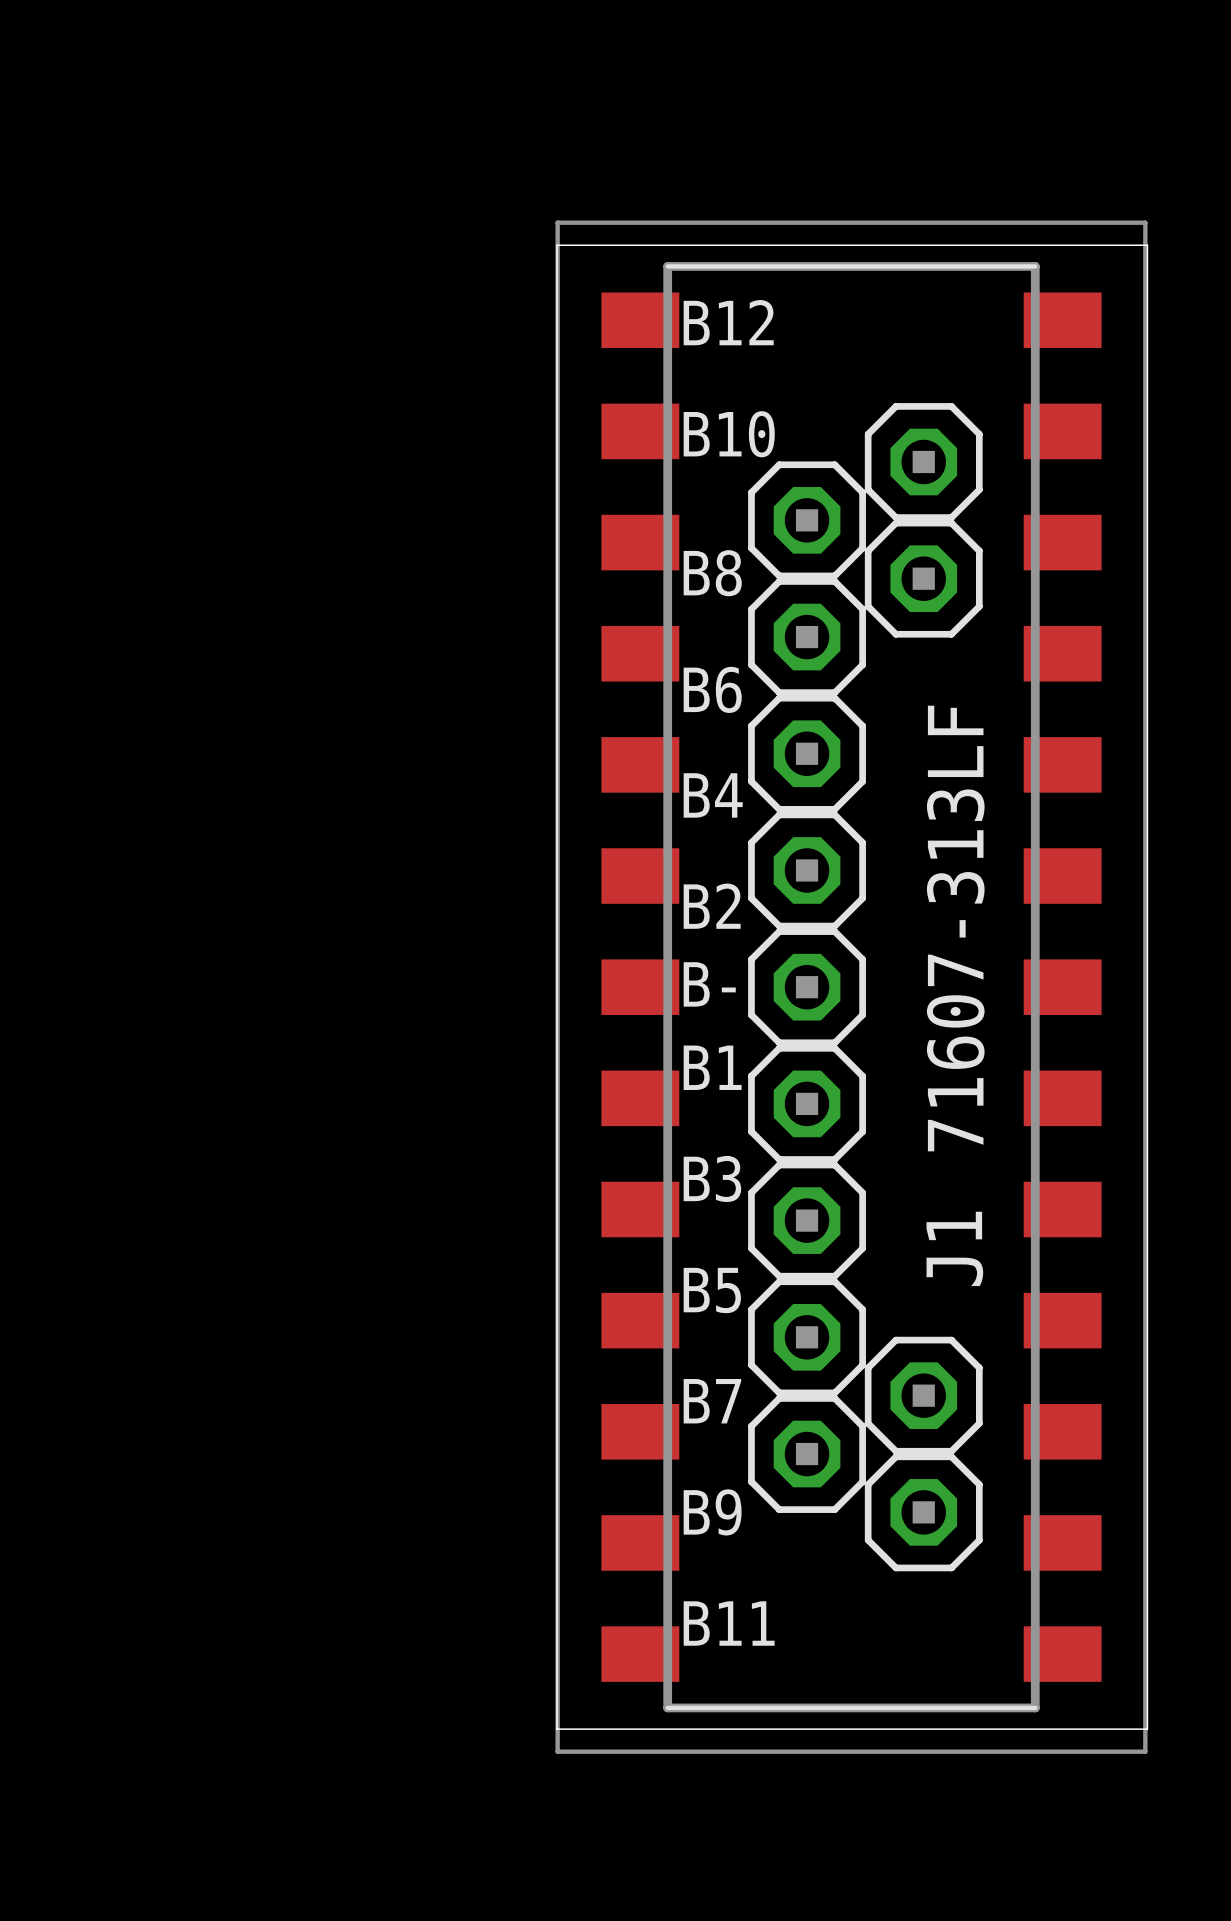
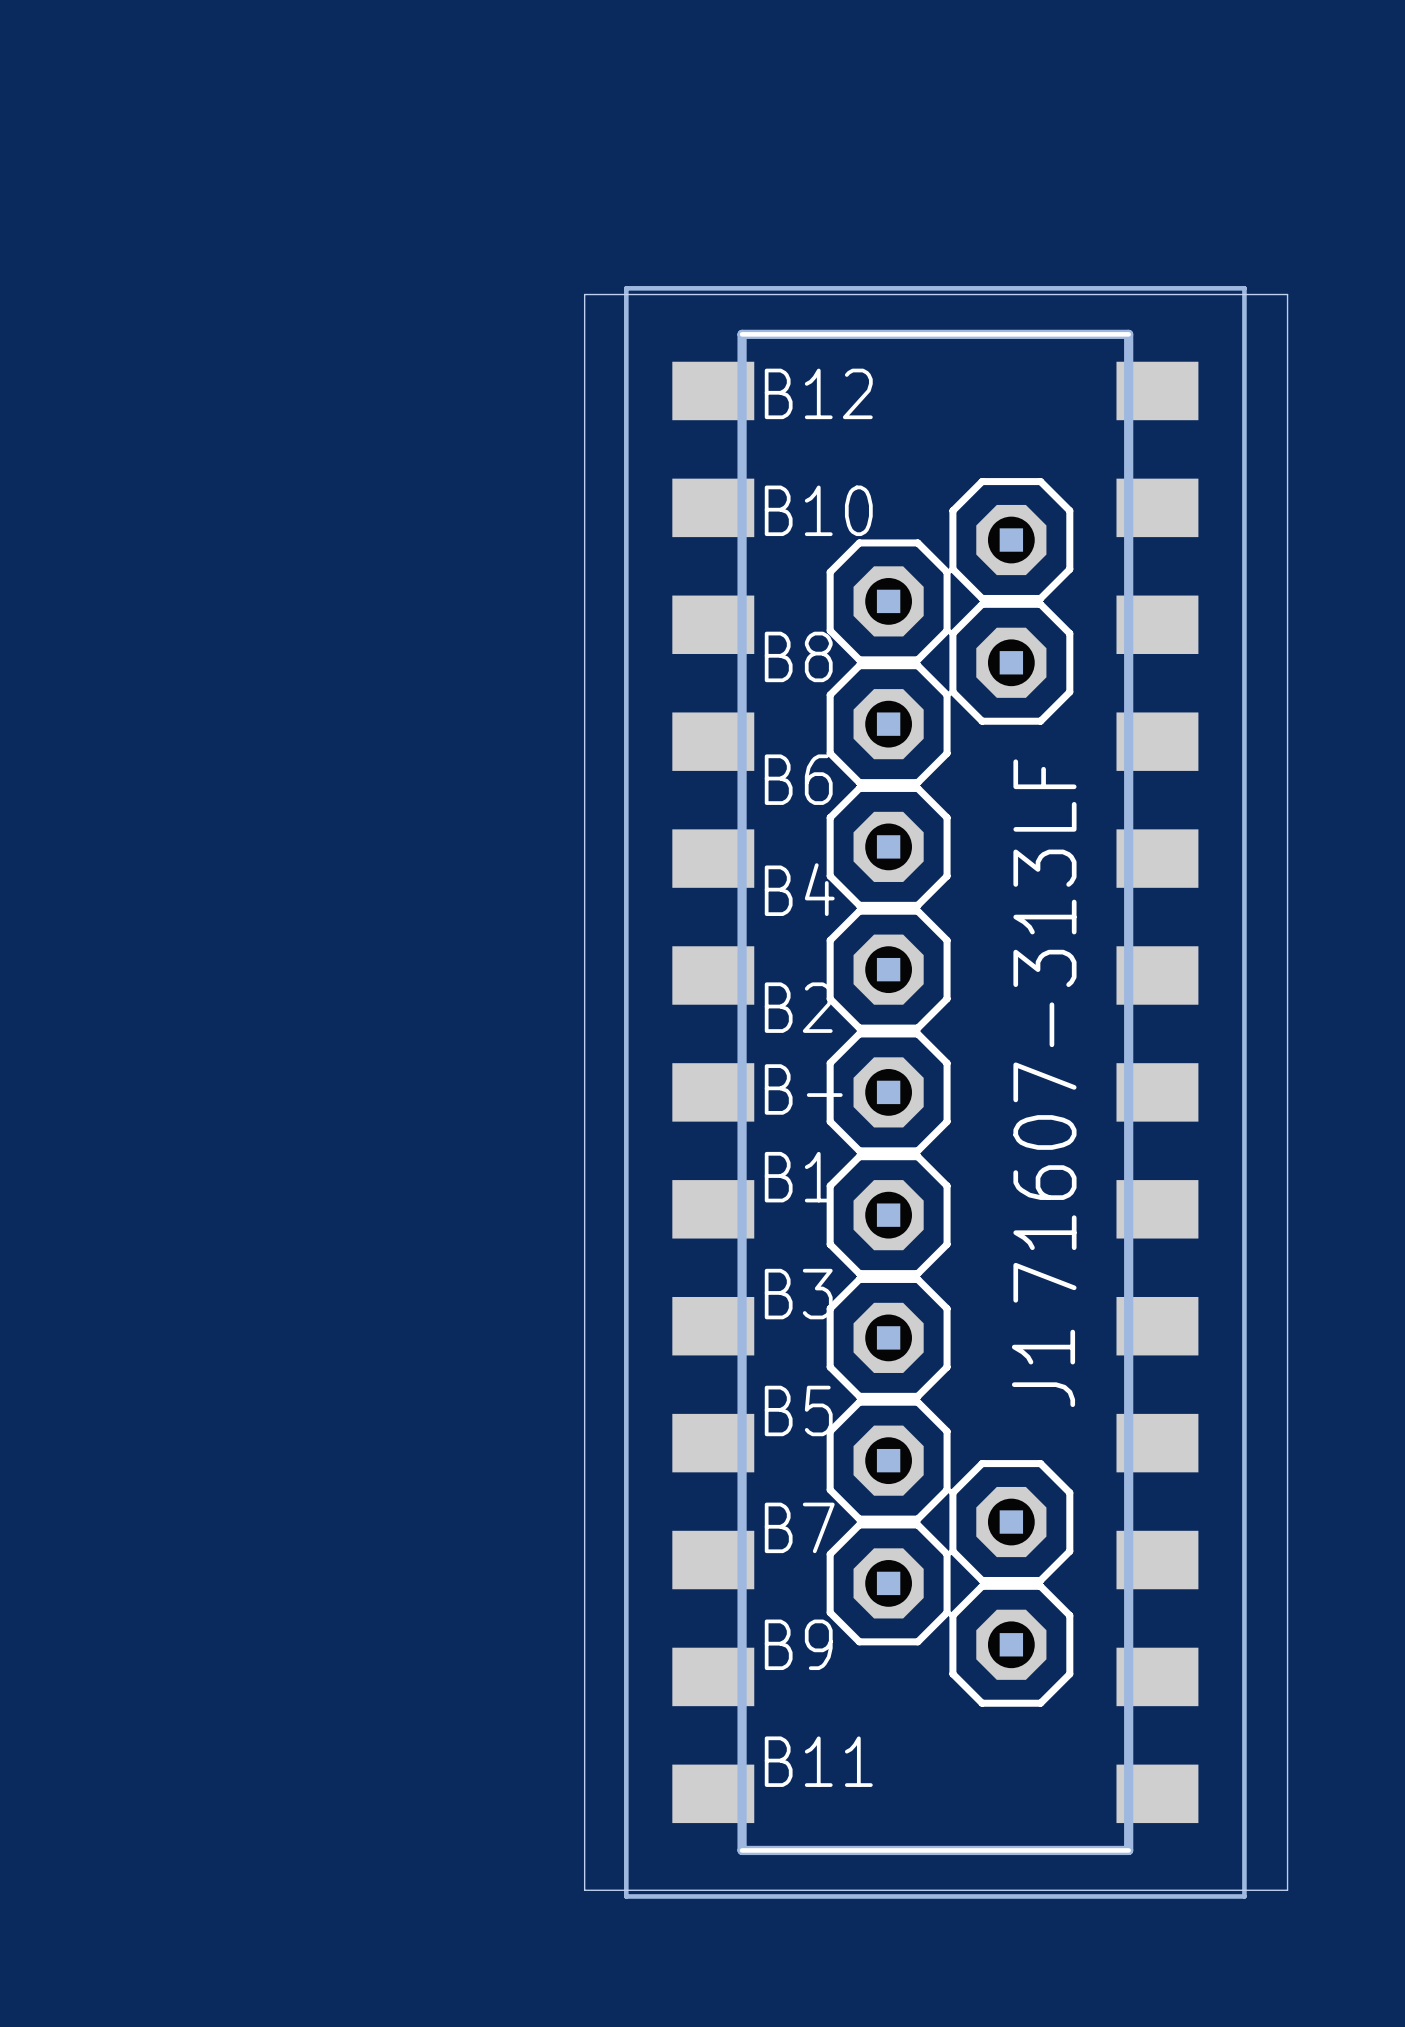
board edge: (556, 245) (1147, 245) (1147, 1729) (556, 1729) (556, 245) -> (584, 294) (584, 1890) (1287, 1890) (1287, 294) (584, 294)

